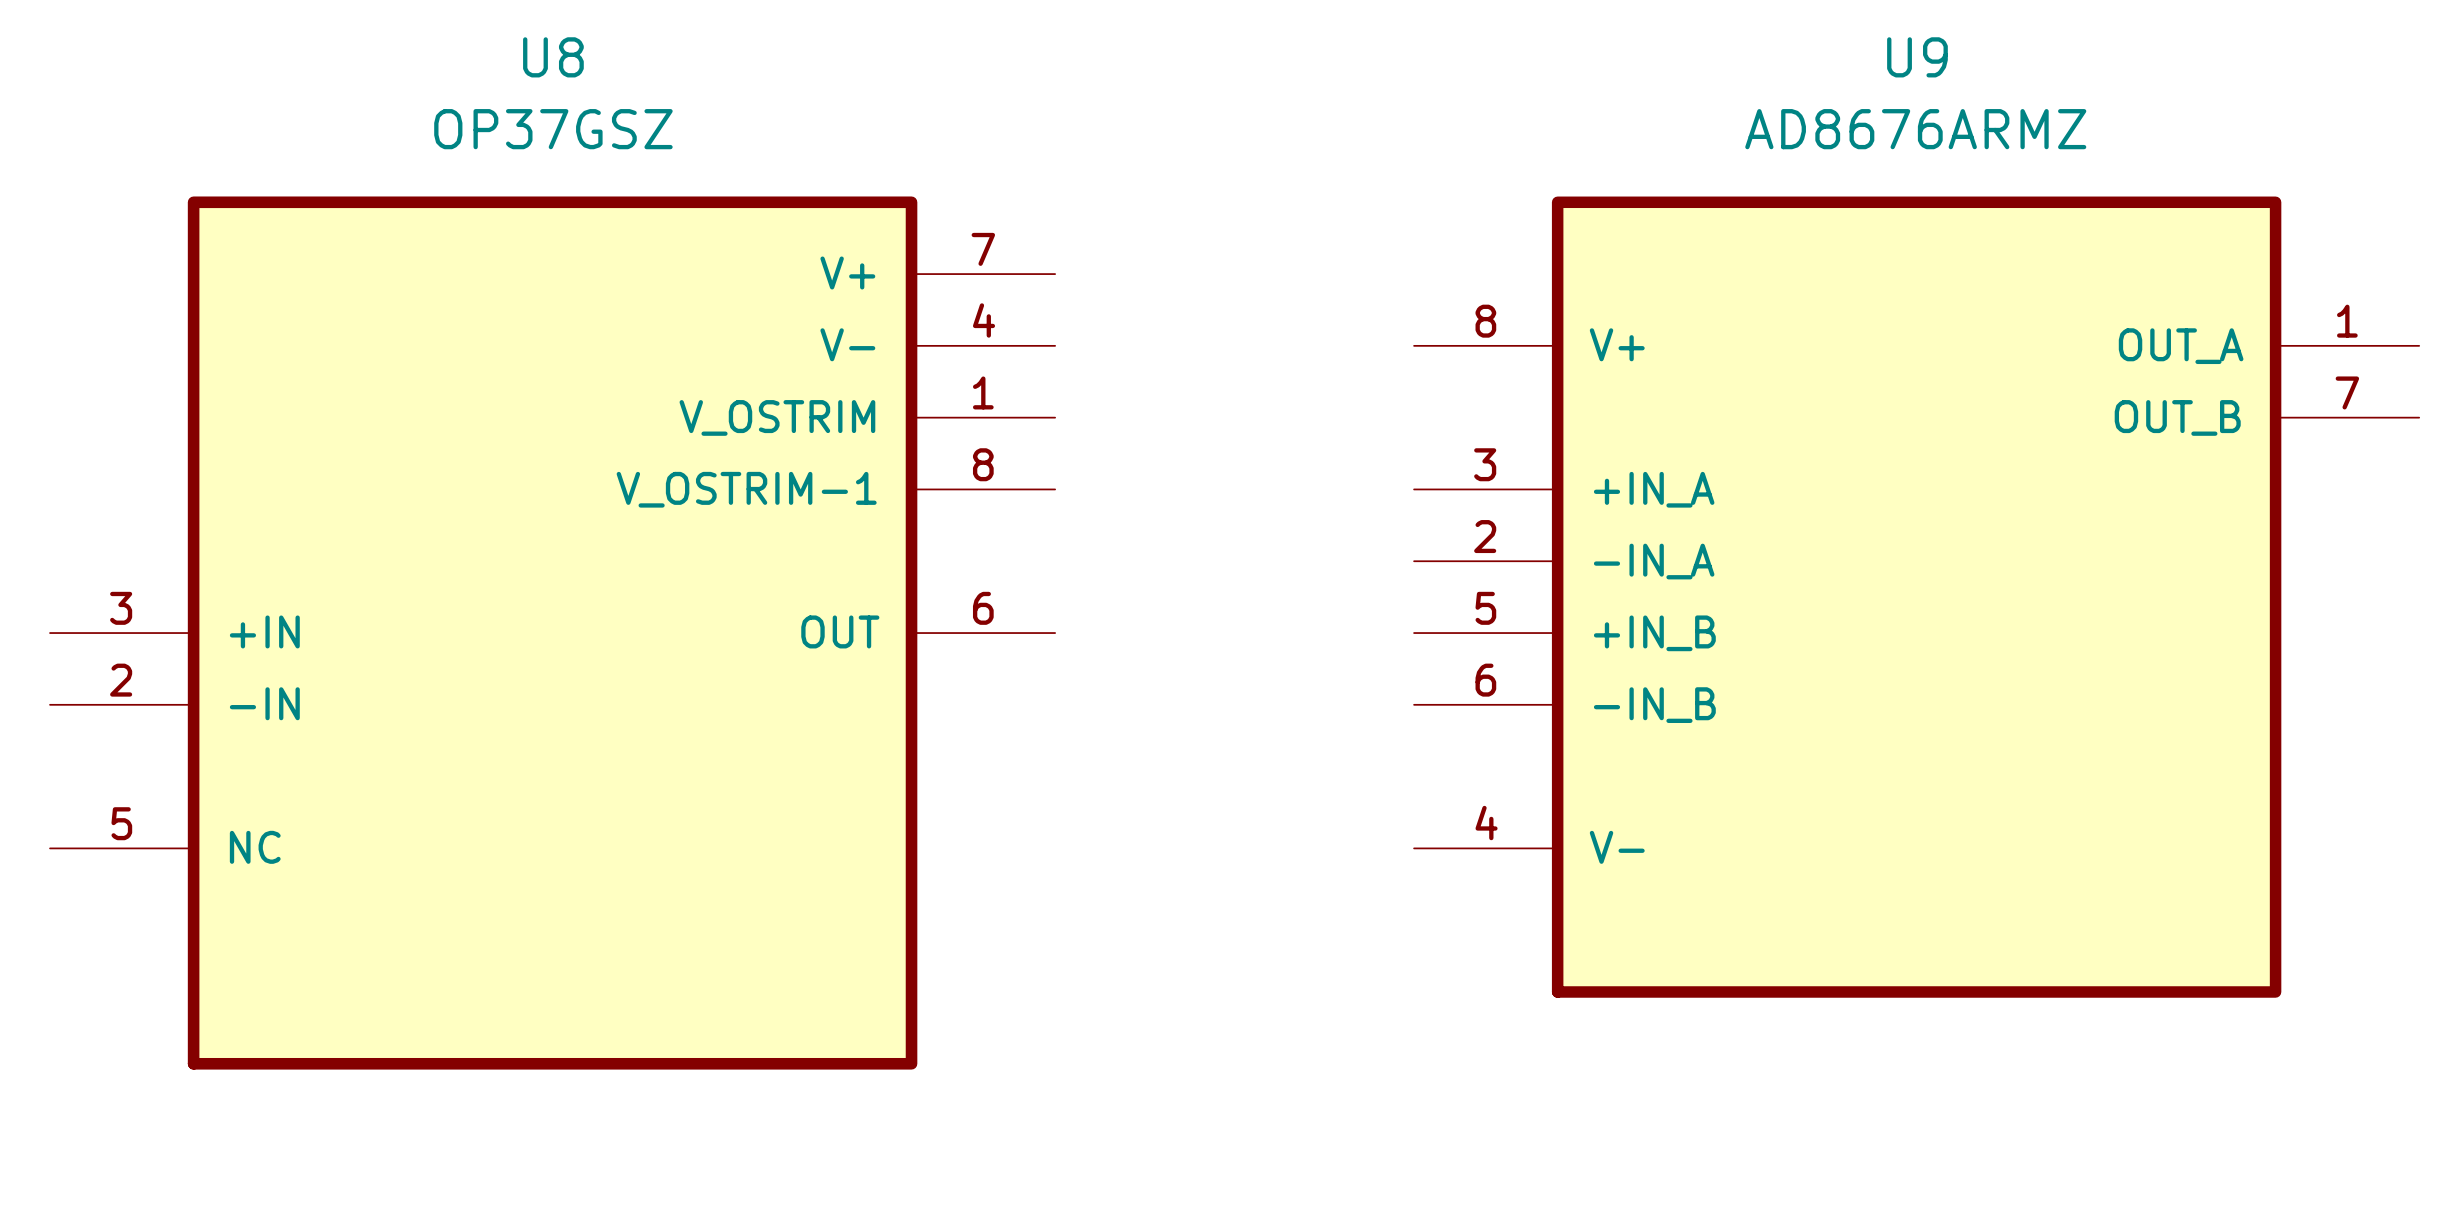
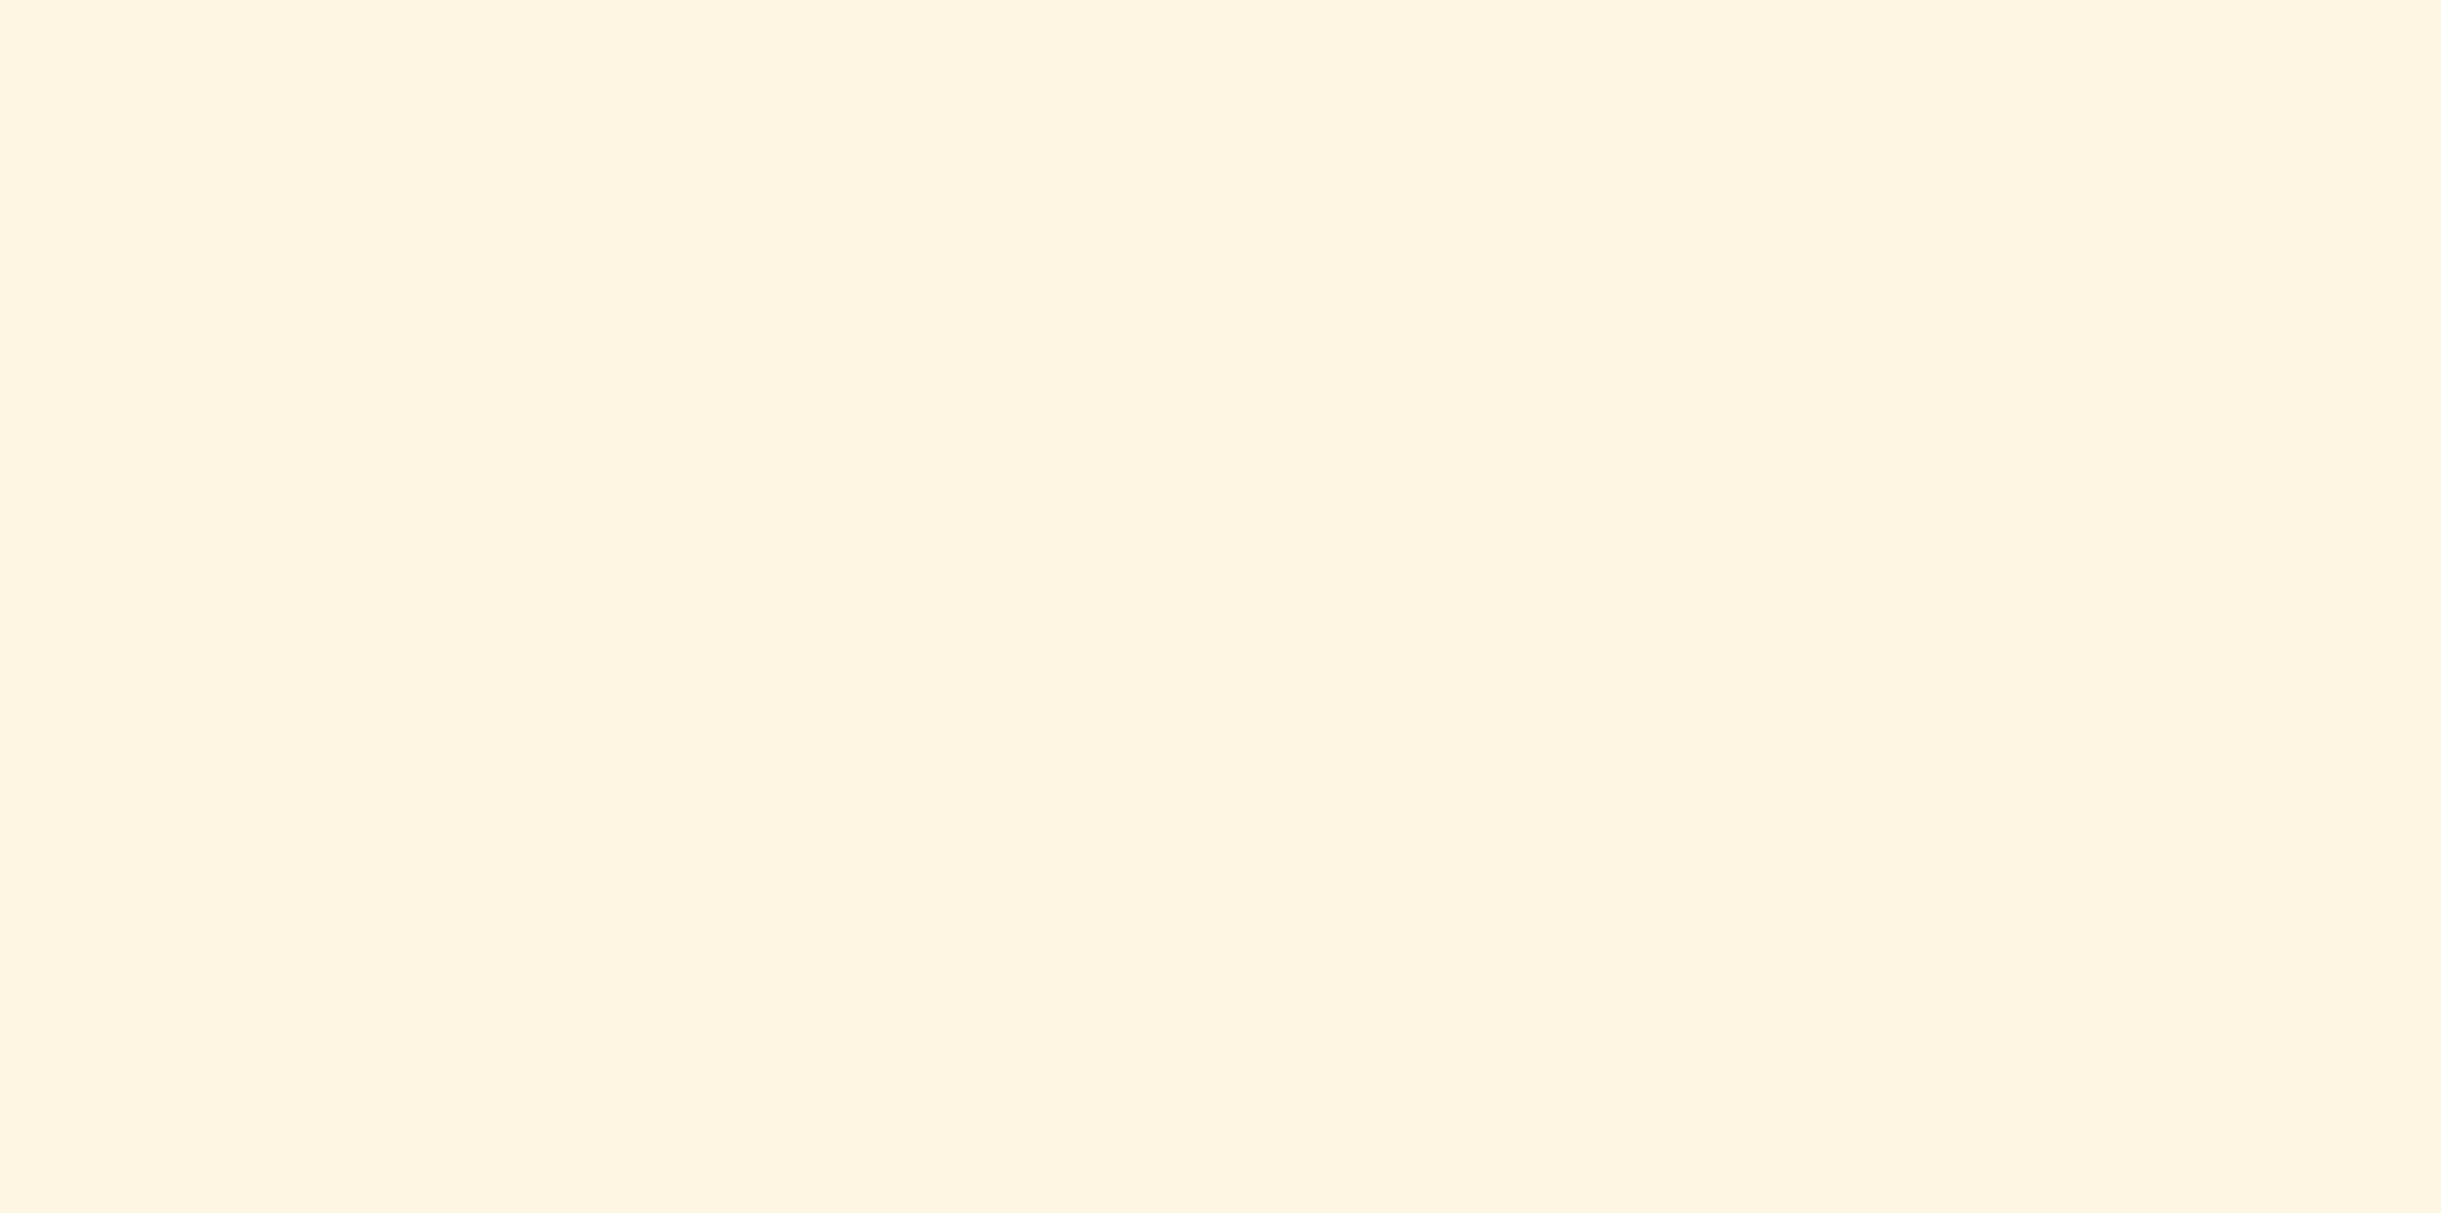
U9: AD8676ARMZ (1916, 597) -> none
U8: OP37GSZ (552, 633) -> none

